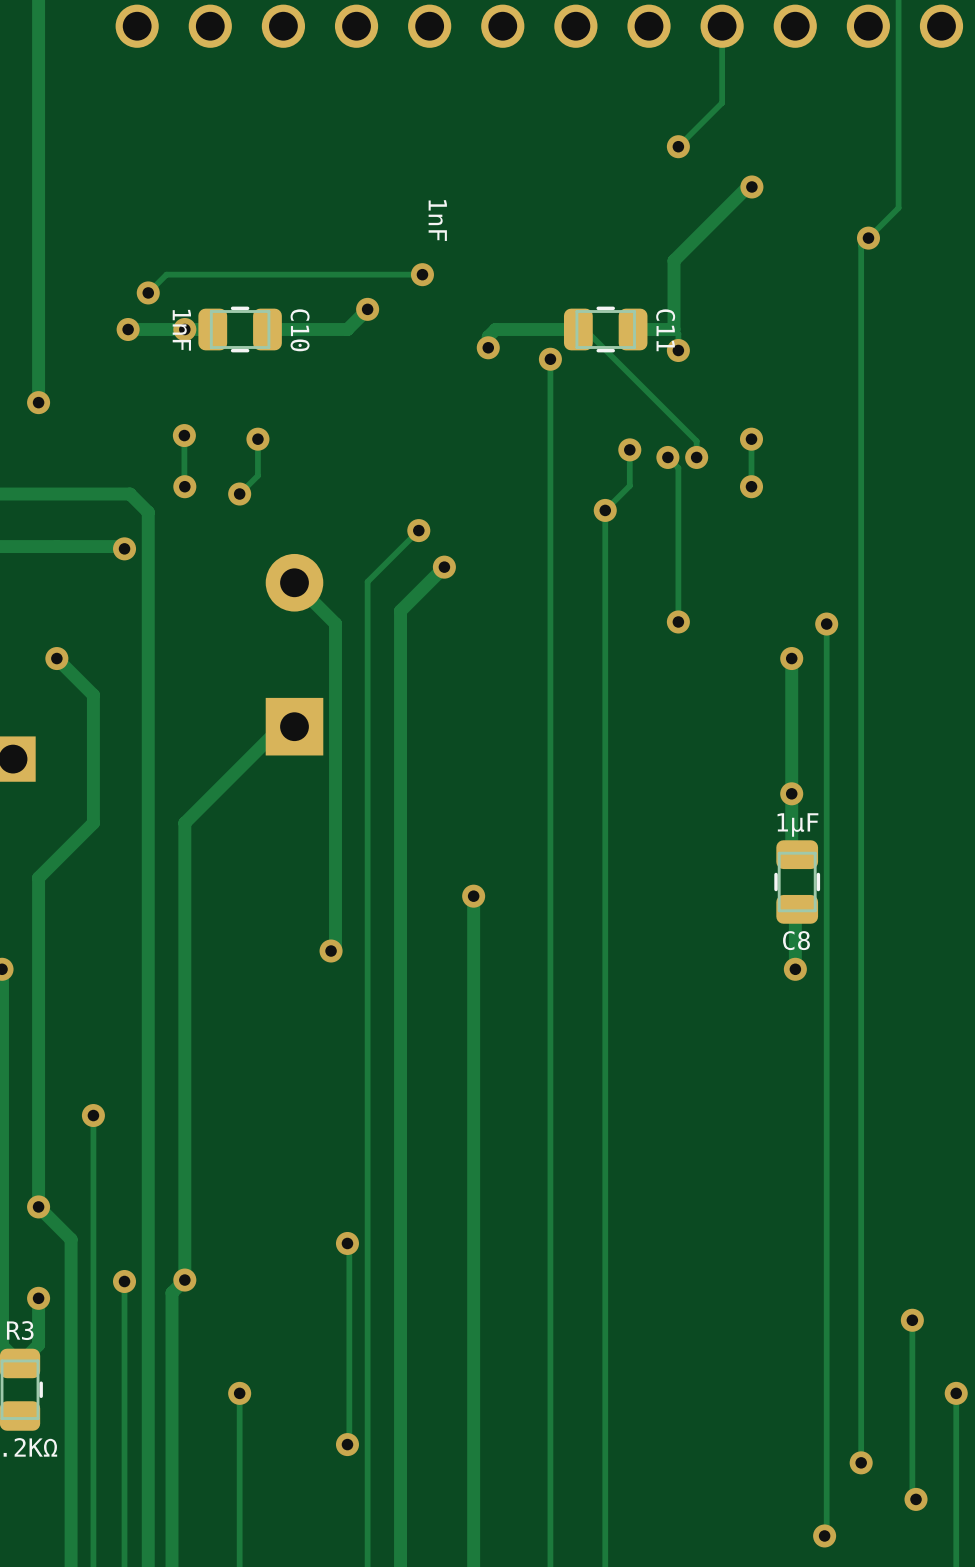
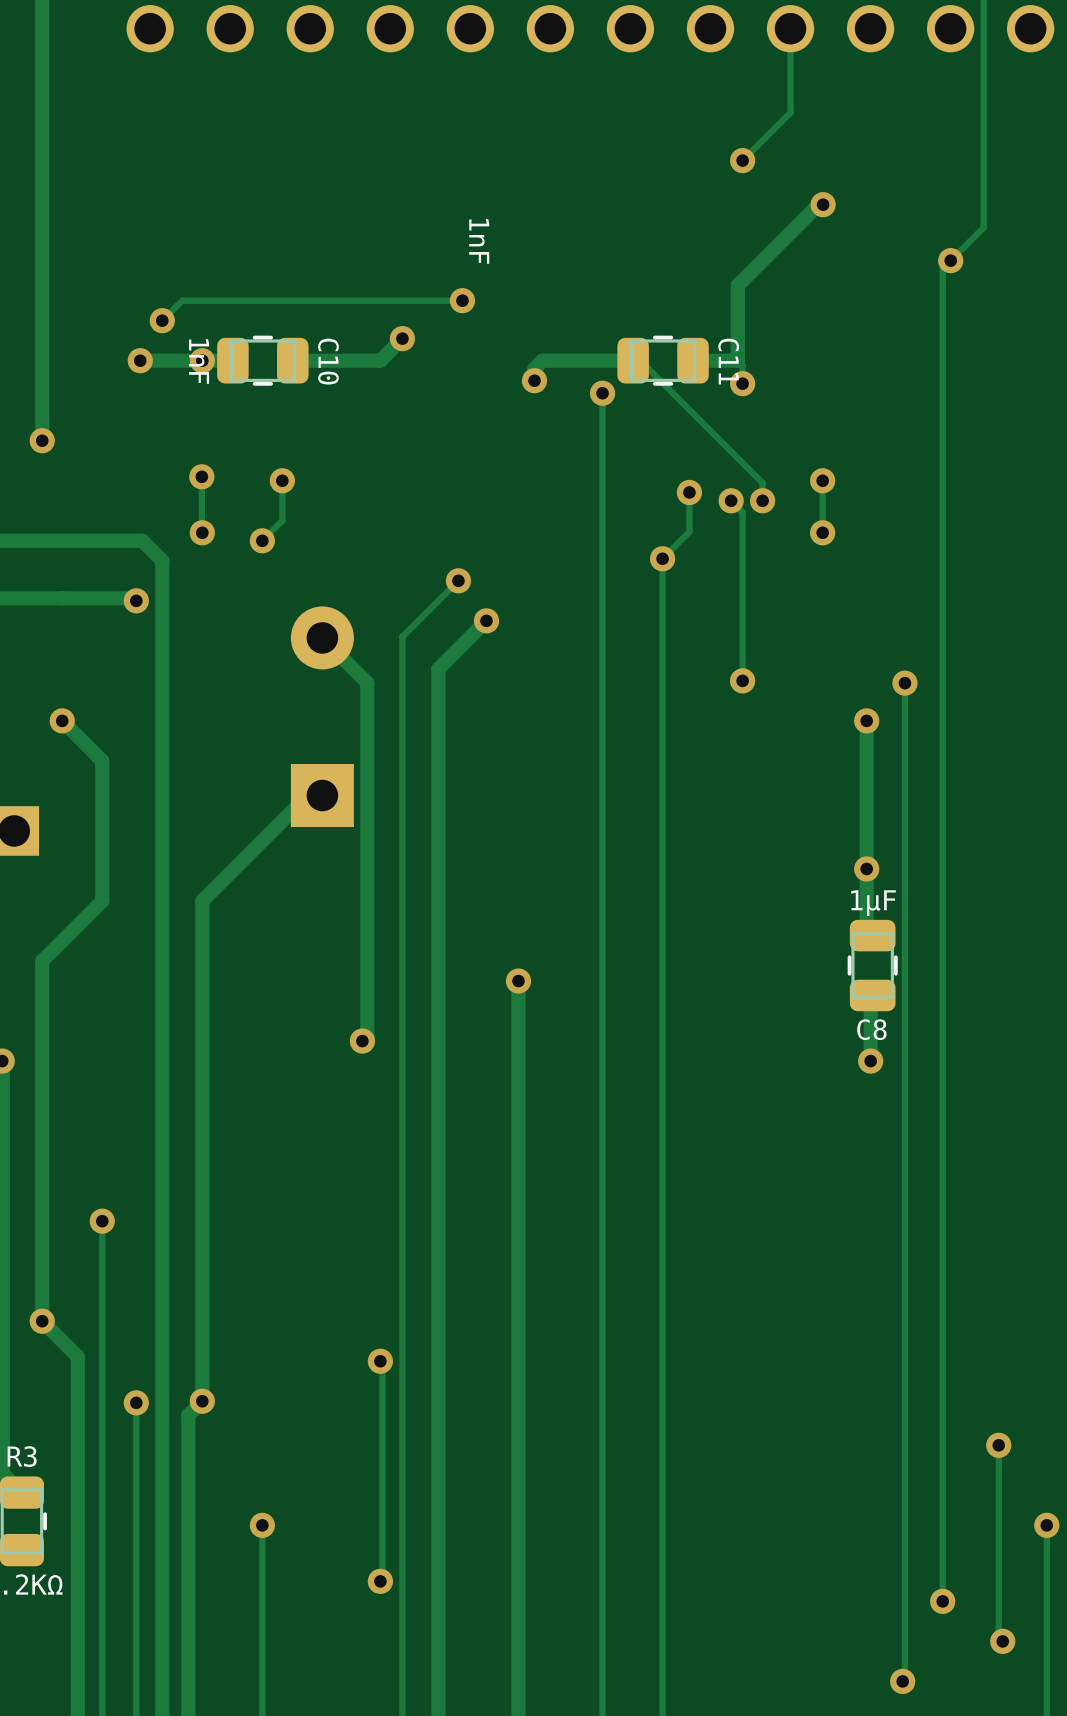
track: (38, 1298) (38, 1344) (20, 1363) -> none
via: (38, 1298) -> none

